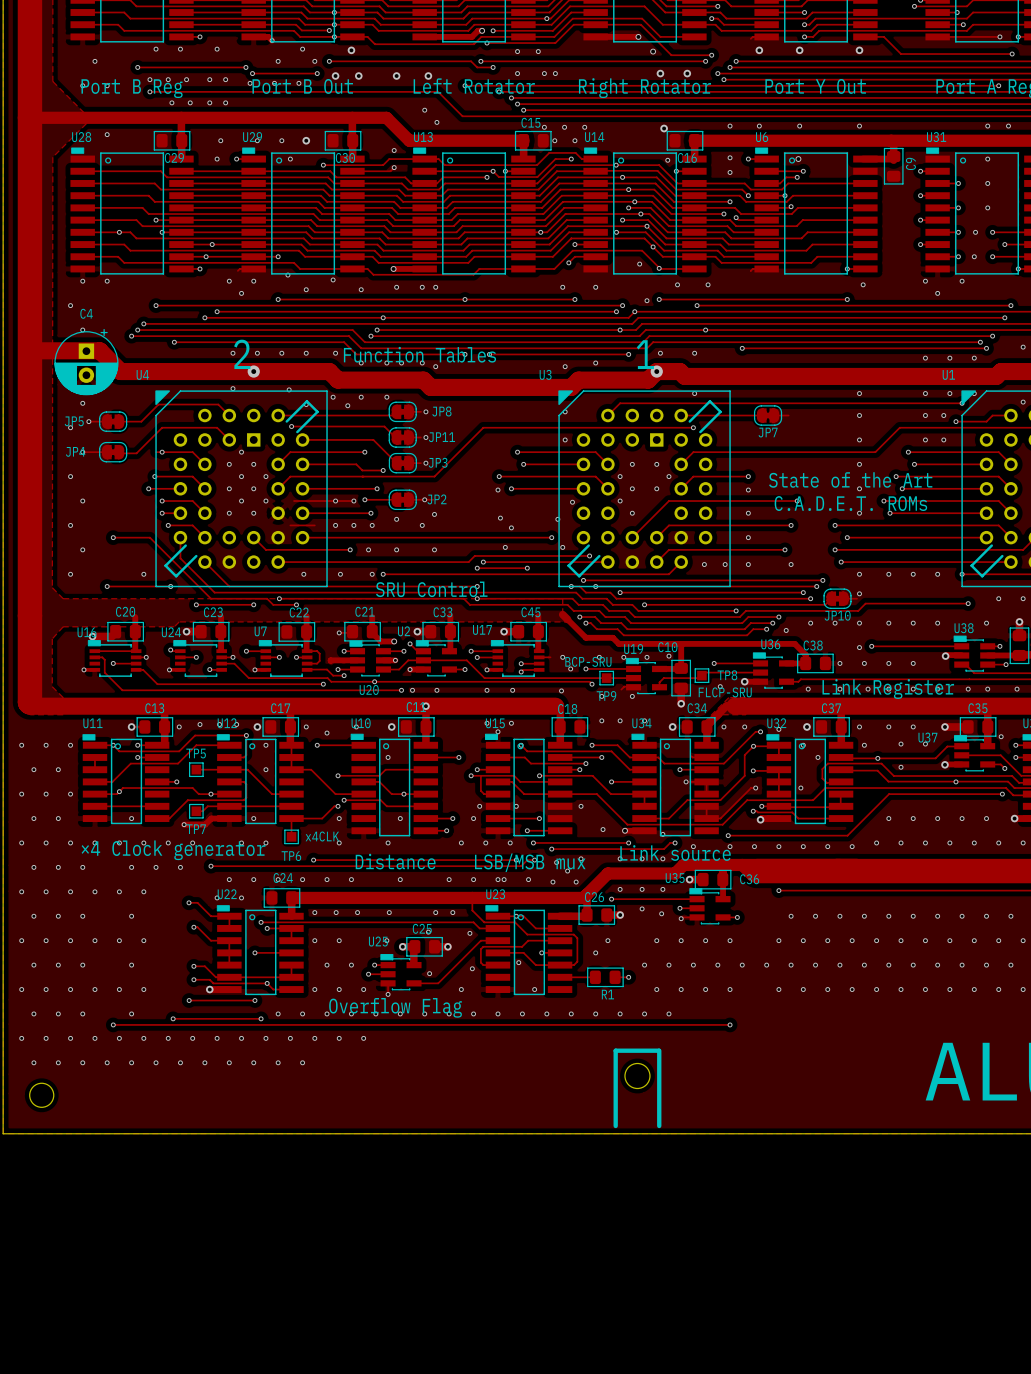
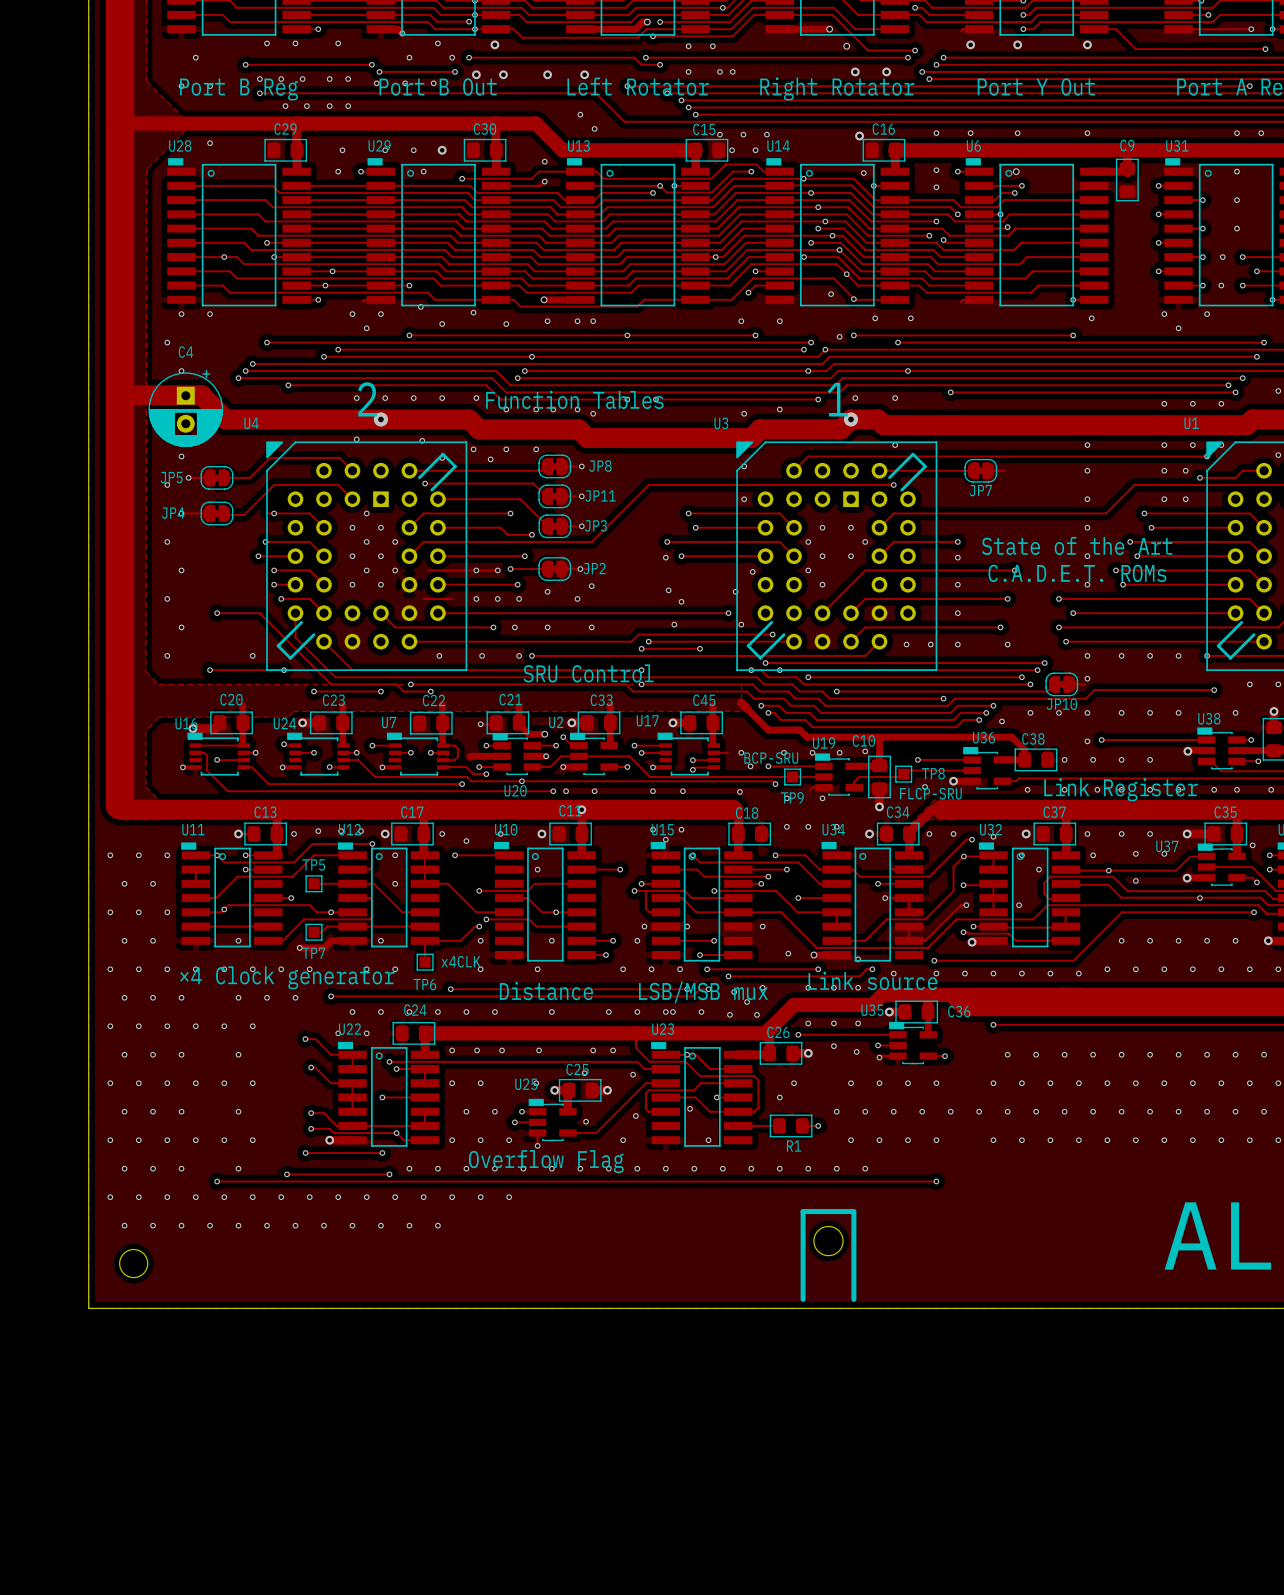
C29 name position: C29 (174, 157) -> C29 (285, 129)
C30 name position: C30 (345, 157) -> C30 (485, 129)
C16 name position: C16 (687, 157) -> C16 (883, 129)
C9 name rotation: 0° (910, 163) -> 90° clockwise (1127, 145)
C9 name position: C9 (910, 163) -> C9 (1127, 145)

